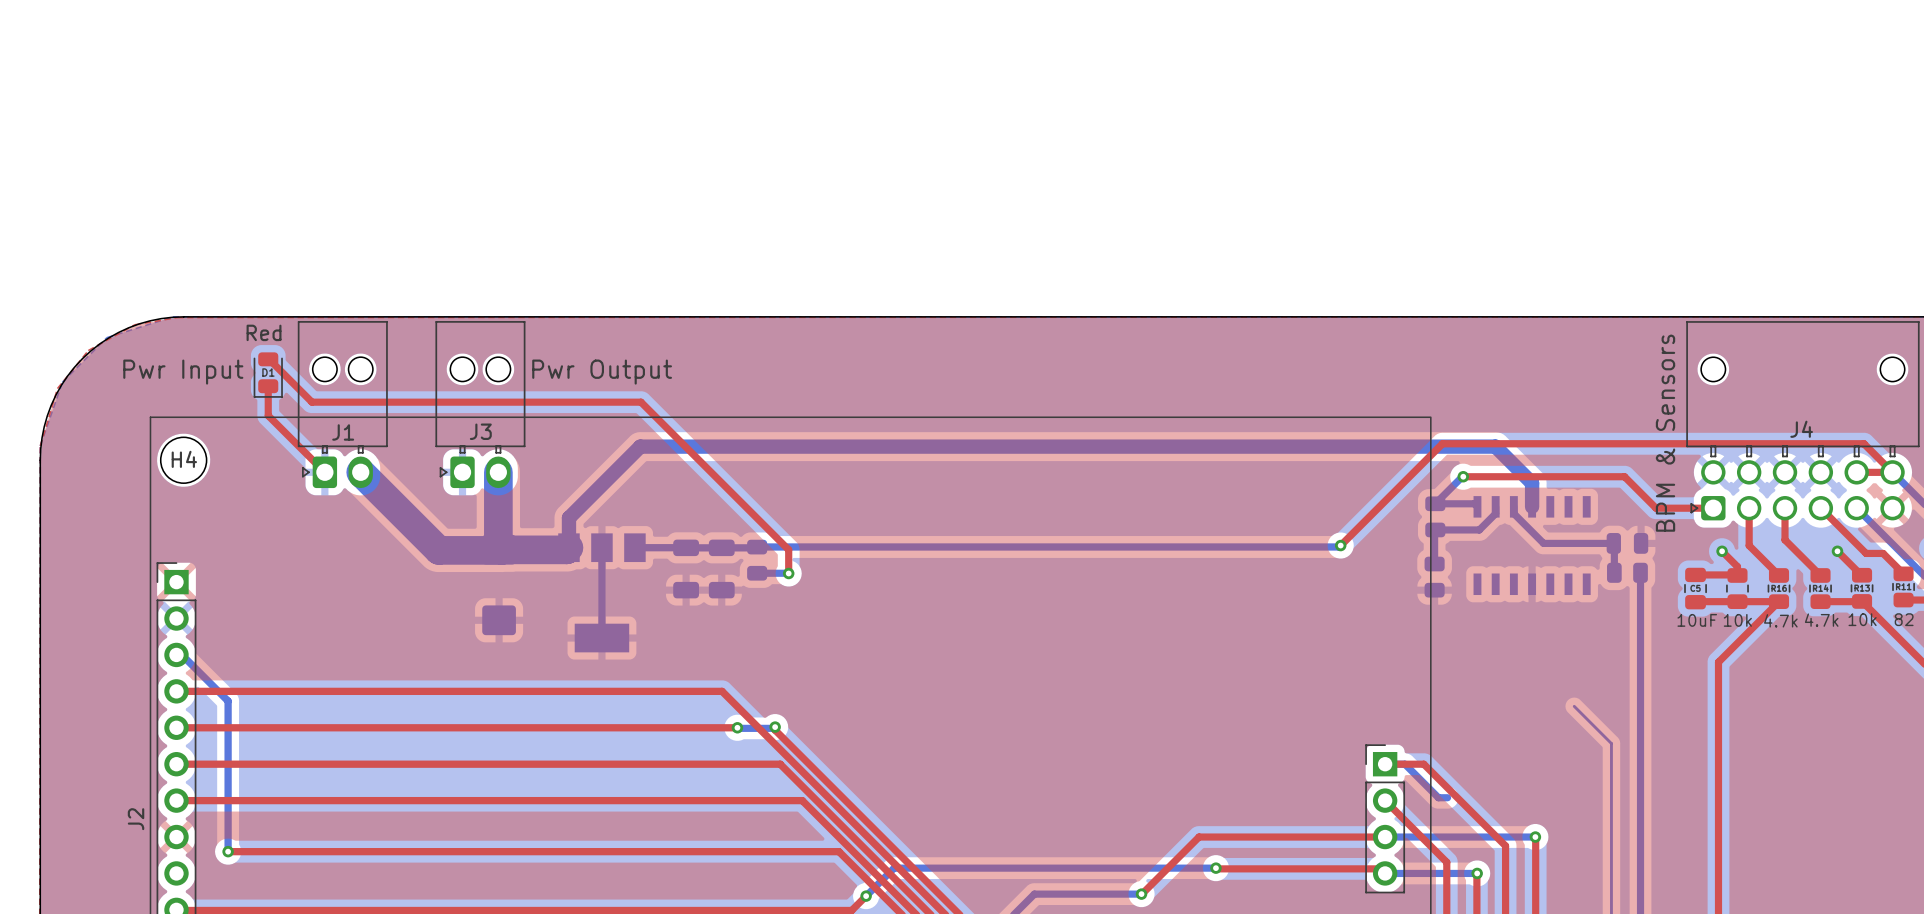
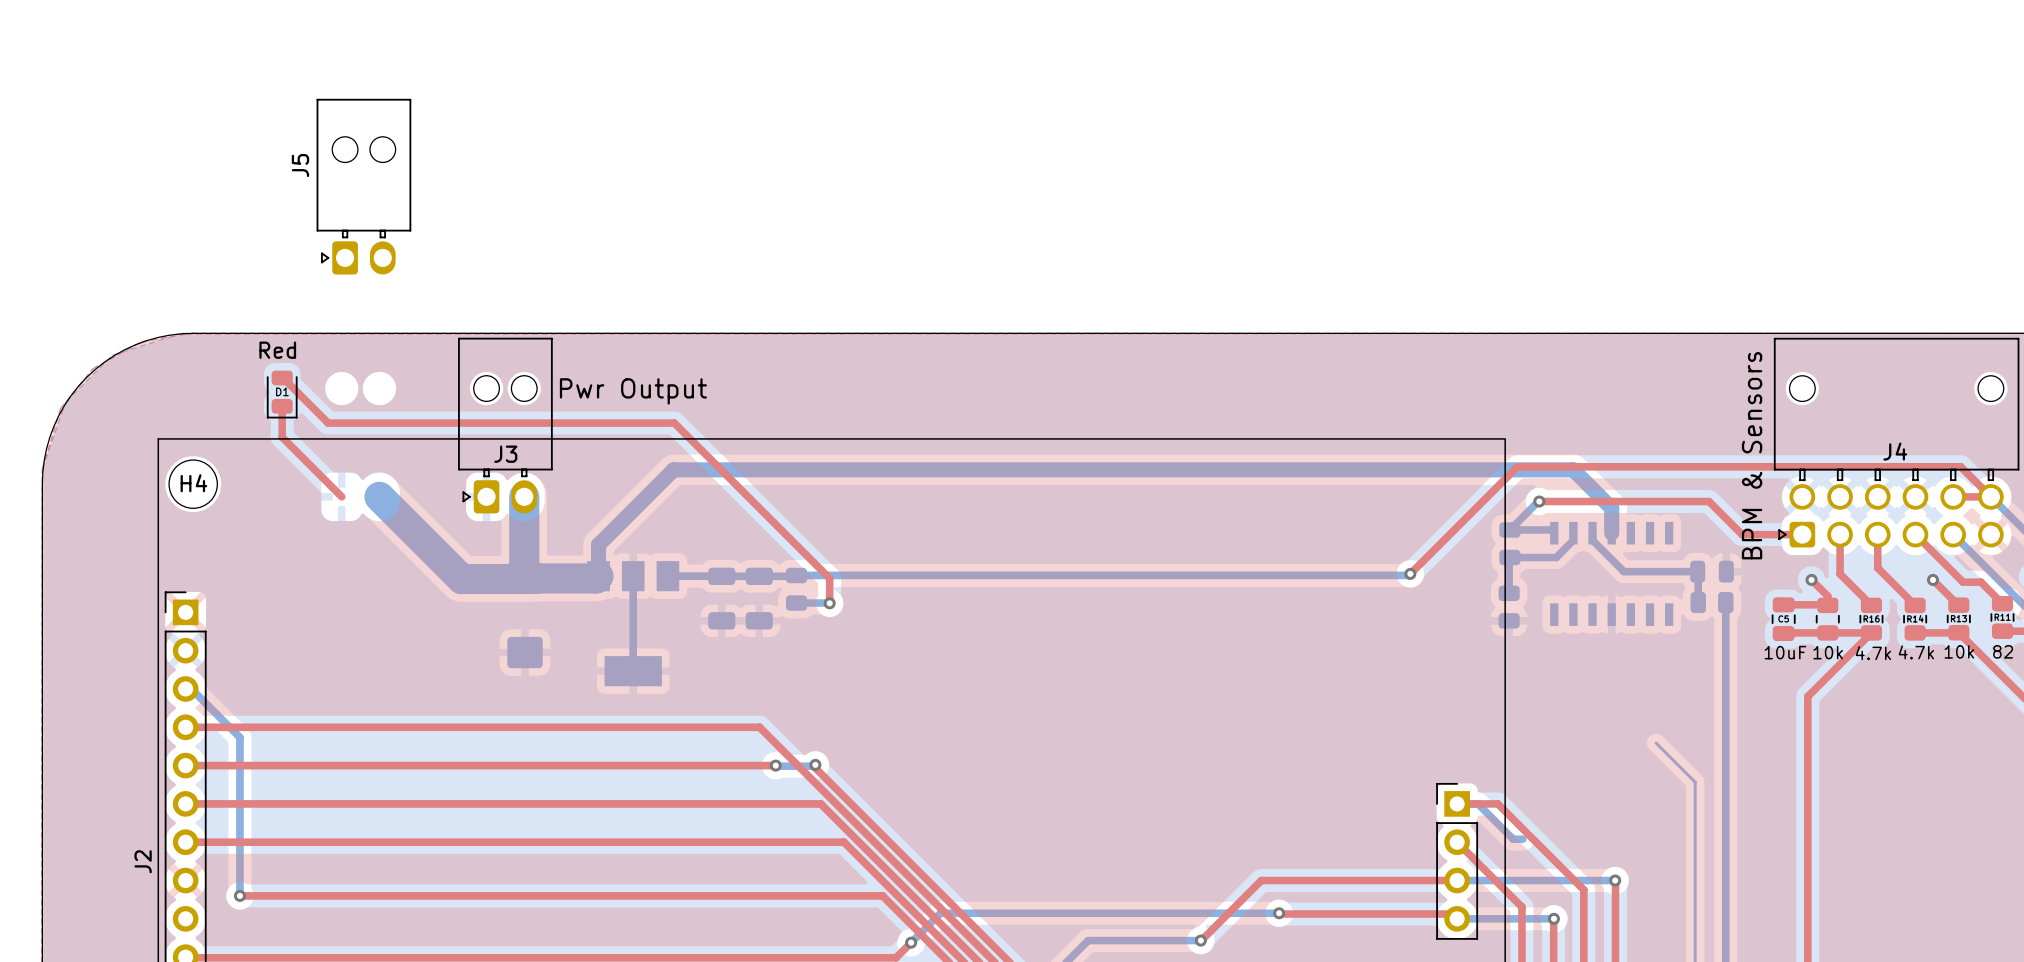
J5: none -> (363, 186)
J1: Pwr Input (342, 404) -> none

